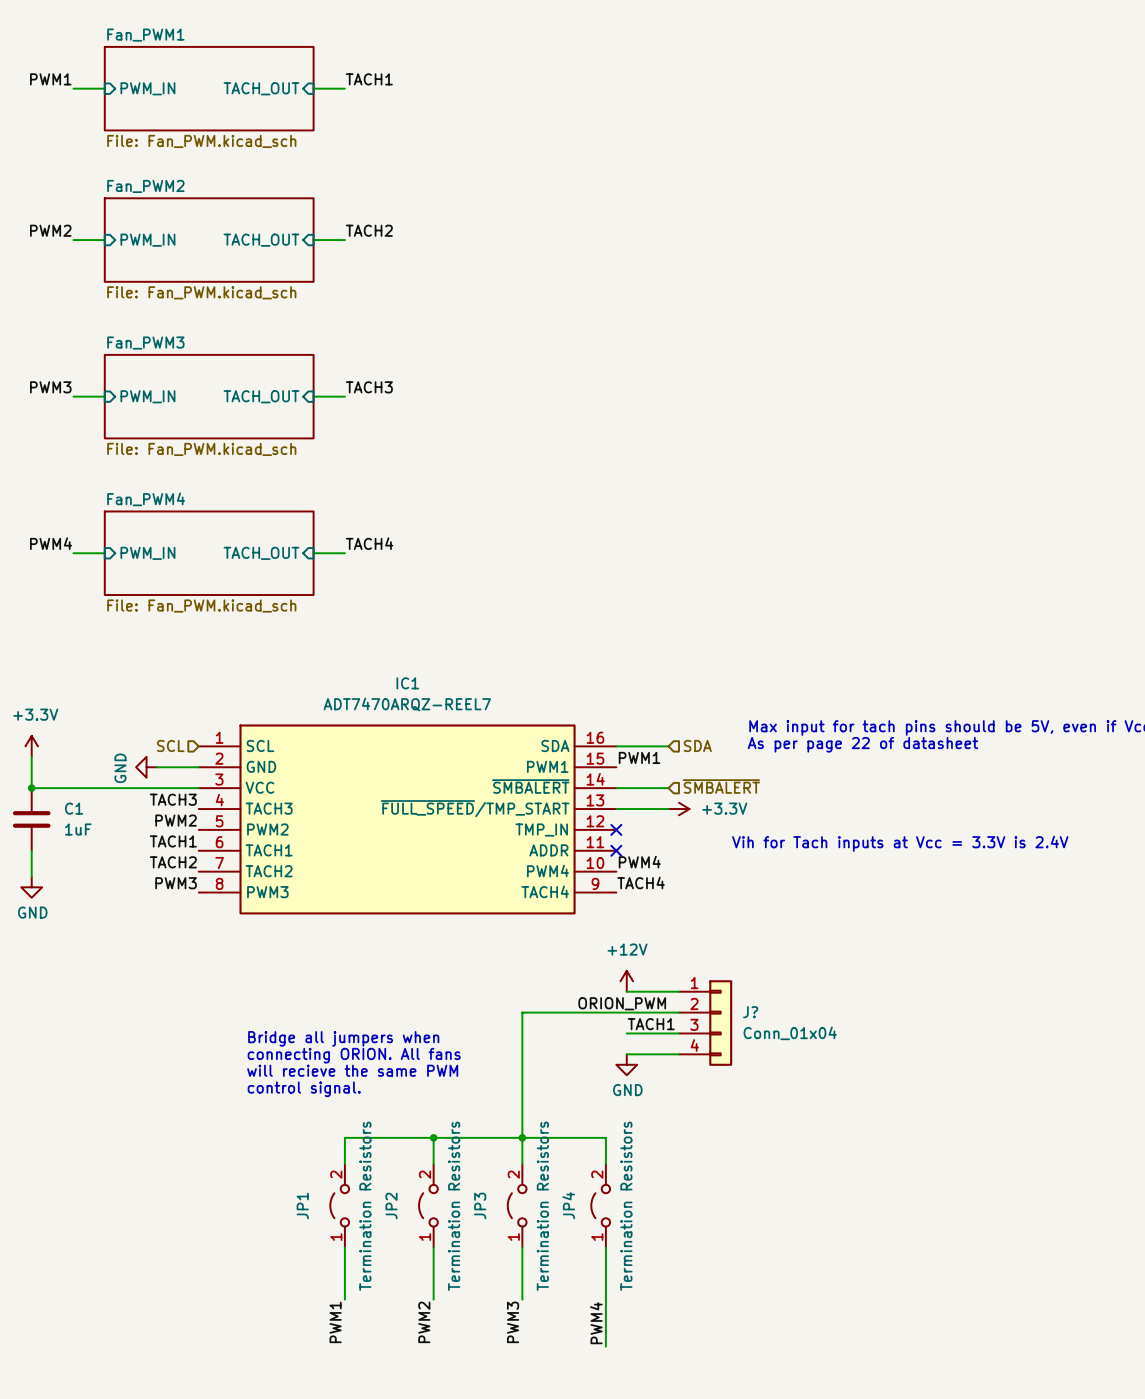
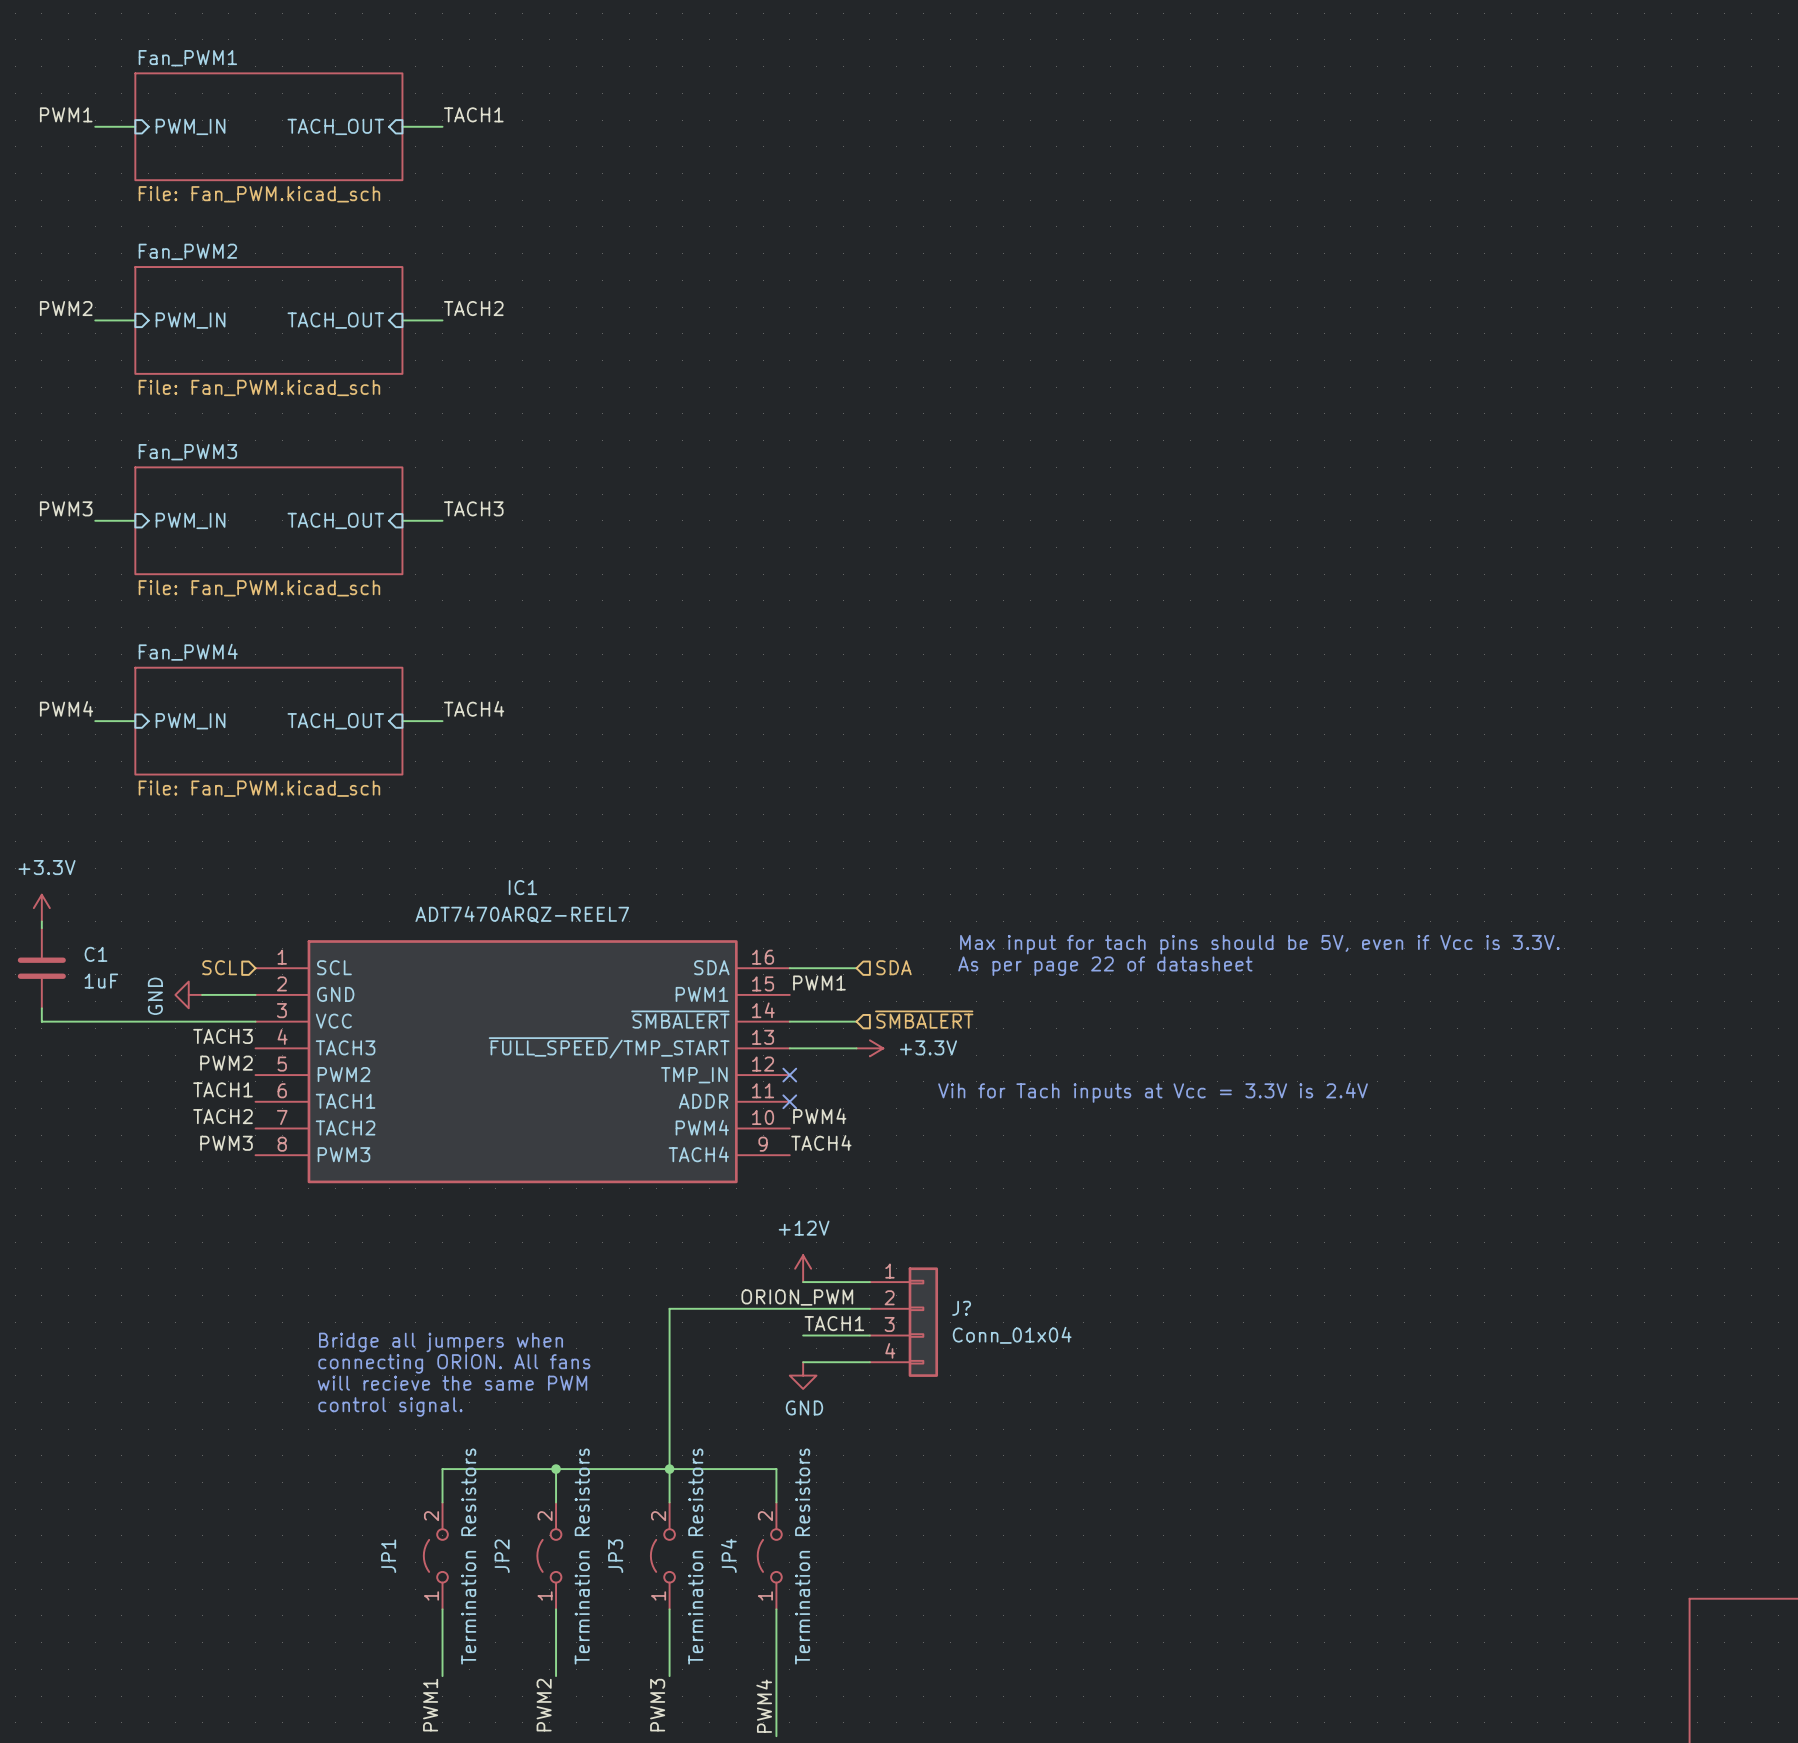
power symbol position: +3.3V (31, 746) -> +3.3V (41, 908)
junction: (31, 788) -> none
C1 position: (31, 819) -> (41, 968)
wire: (31, 850) (31, 876) -> none
power symbol: GND (31, 887) -> none

